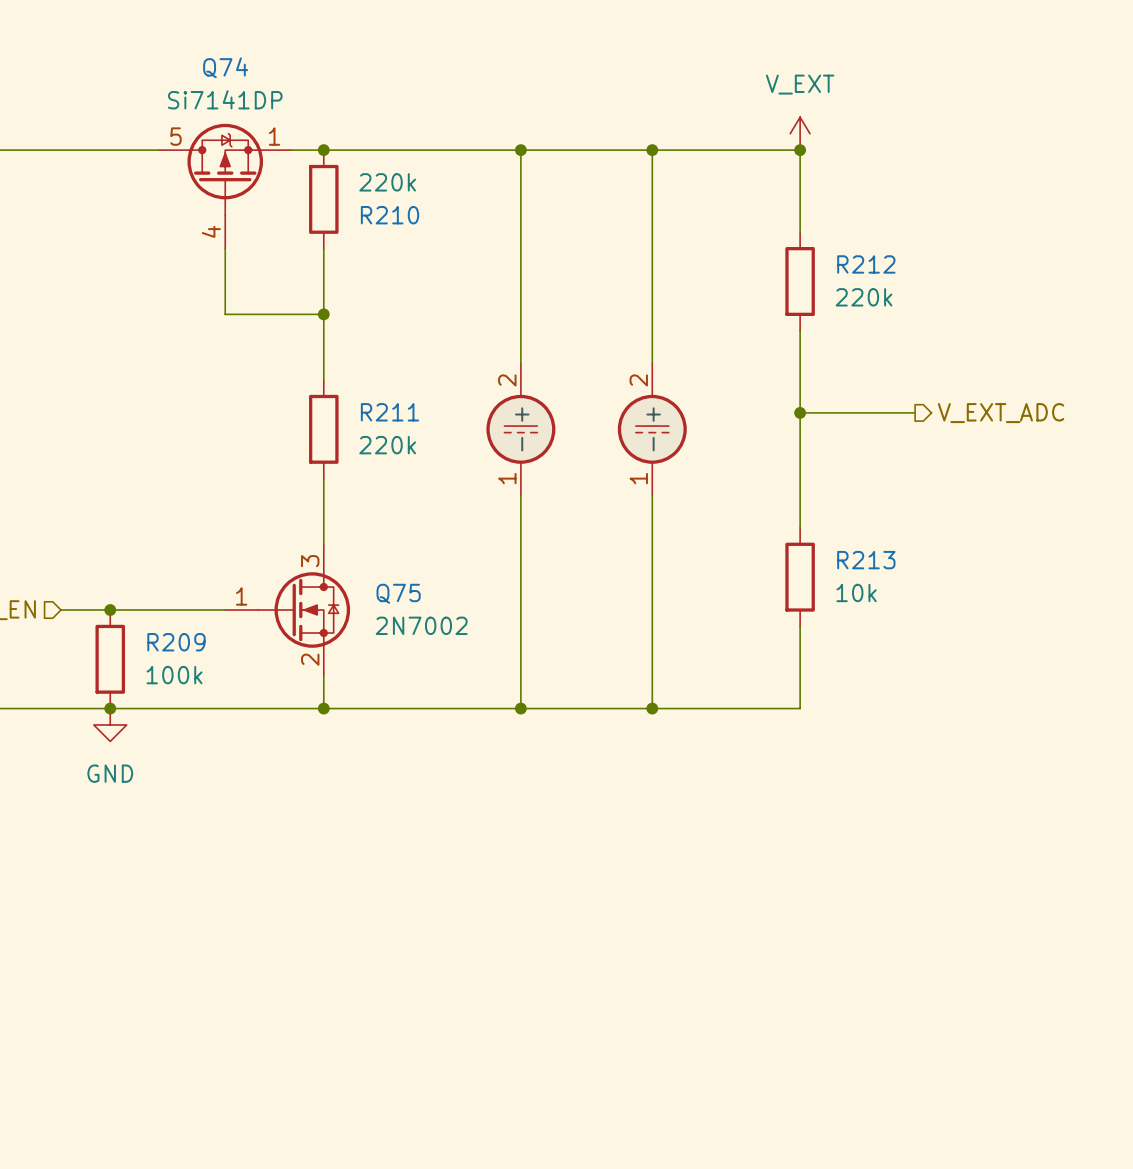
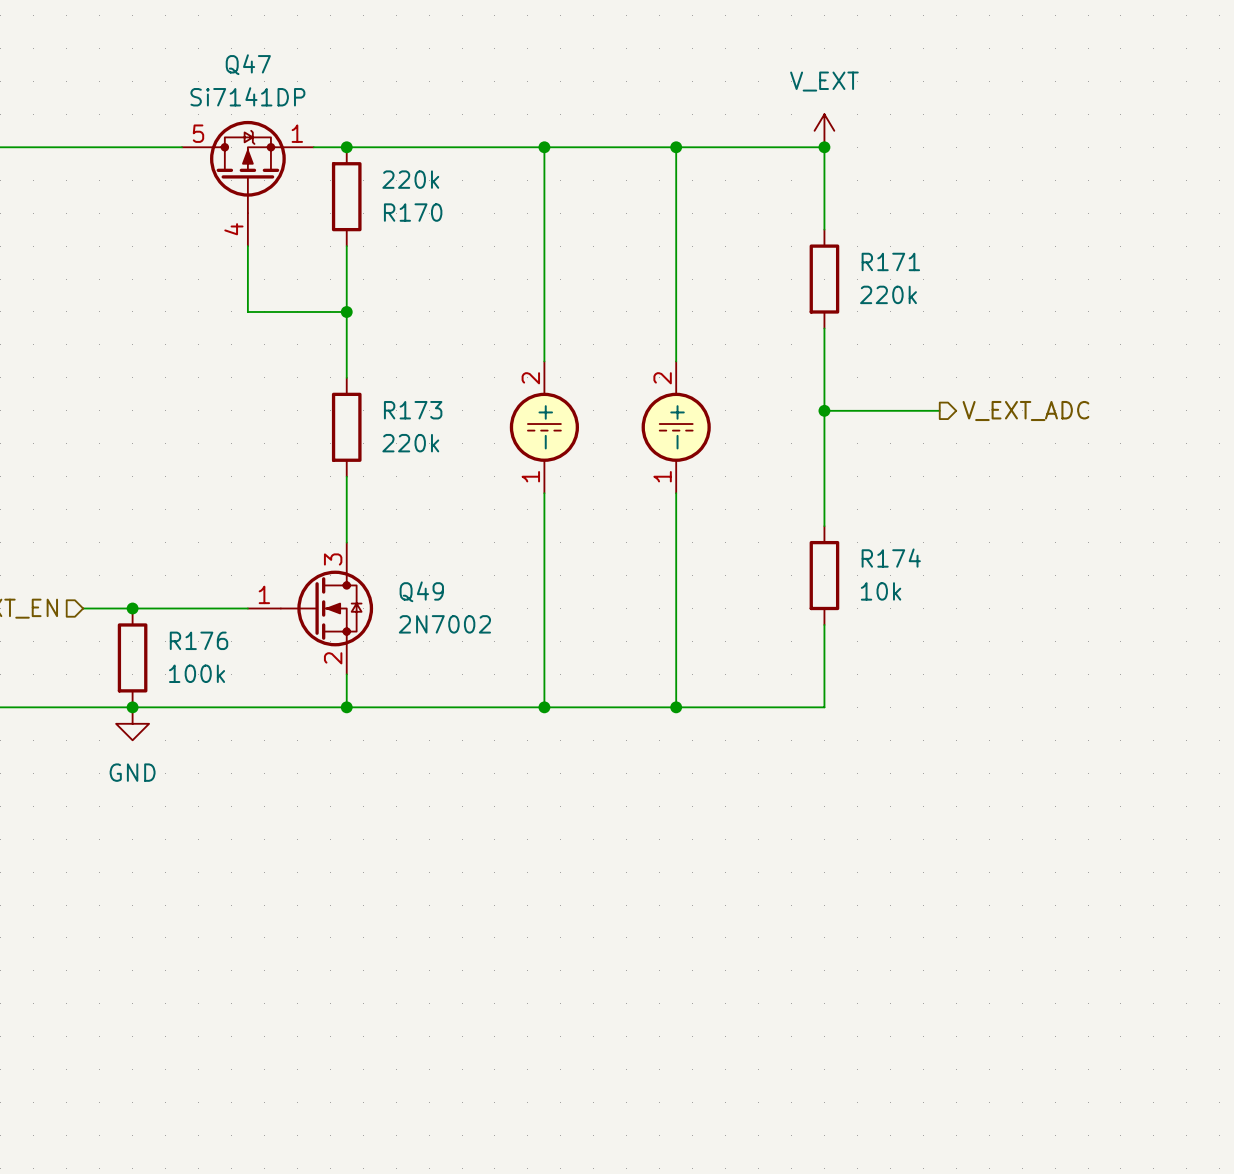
Q74 name: Q74 (225, 67) -> Q47 (248, 64)
R210 name: R210 (390, 215) -> R170 (413, 212)
R212 name: R212 (866, 264) -> R171 (890, 261)
R211 name: R211 (390, 412) -> R173 (413, 410)
R213 name: R213 (866, 560) -> R174 (891, 558)
Q75 name: Q75 (398, 593) -> Q49 (421, 591)
R209 name: R209 (176, 642) -> R176 (199, 640)

